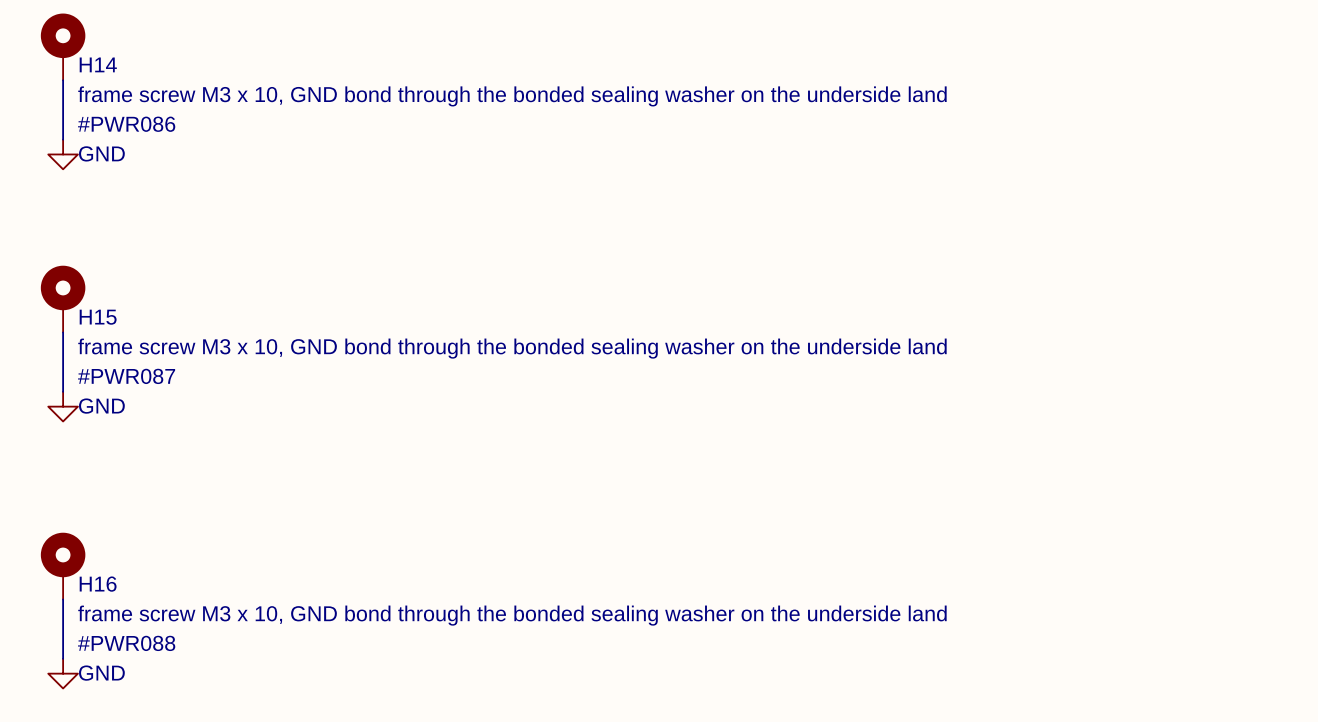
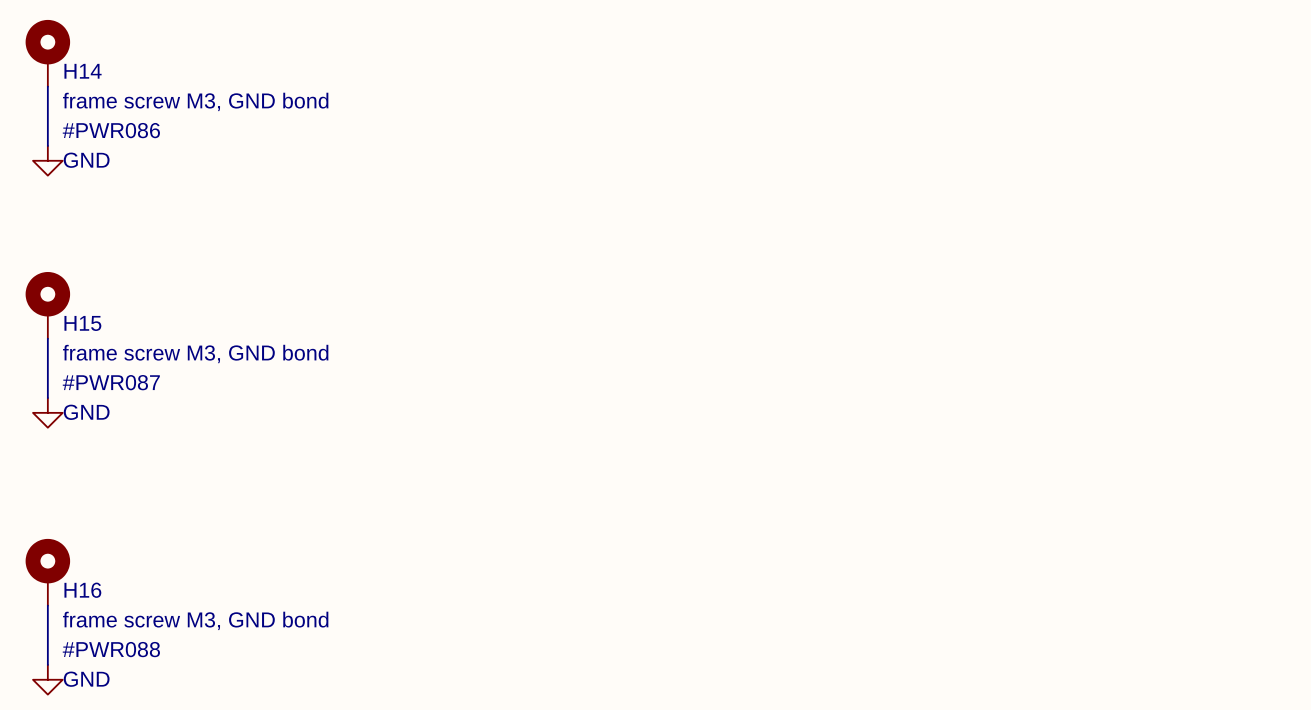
H14 value: frame screw M3 x 10, GND bond through the bonded sealing washer on the underside land (512, 96) -> frame screw M3, GND bond (195, 101)
H15 value: frame screw M3 x 10, GND bond through the bonded sealing washer on the underside land (512, 348) -> frame screw M3, GND bond (195, 353)
H16 value: frame screw M3 x 10, GND bond through the bonded sealing washer on the underside land (512, 615) -> frame screw M3, GND bond (195, 620)

